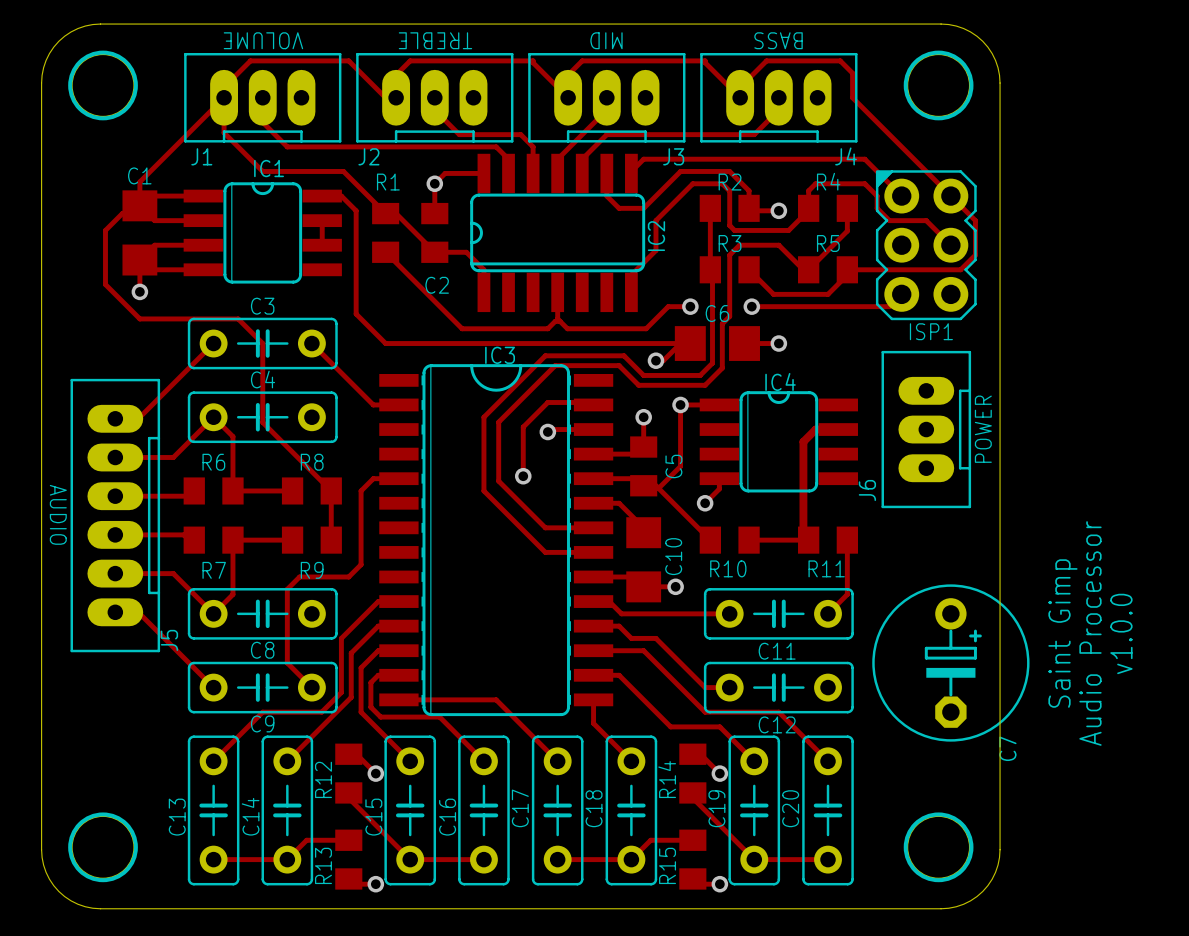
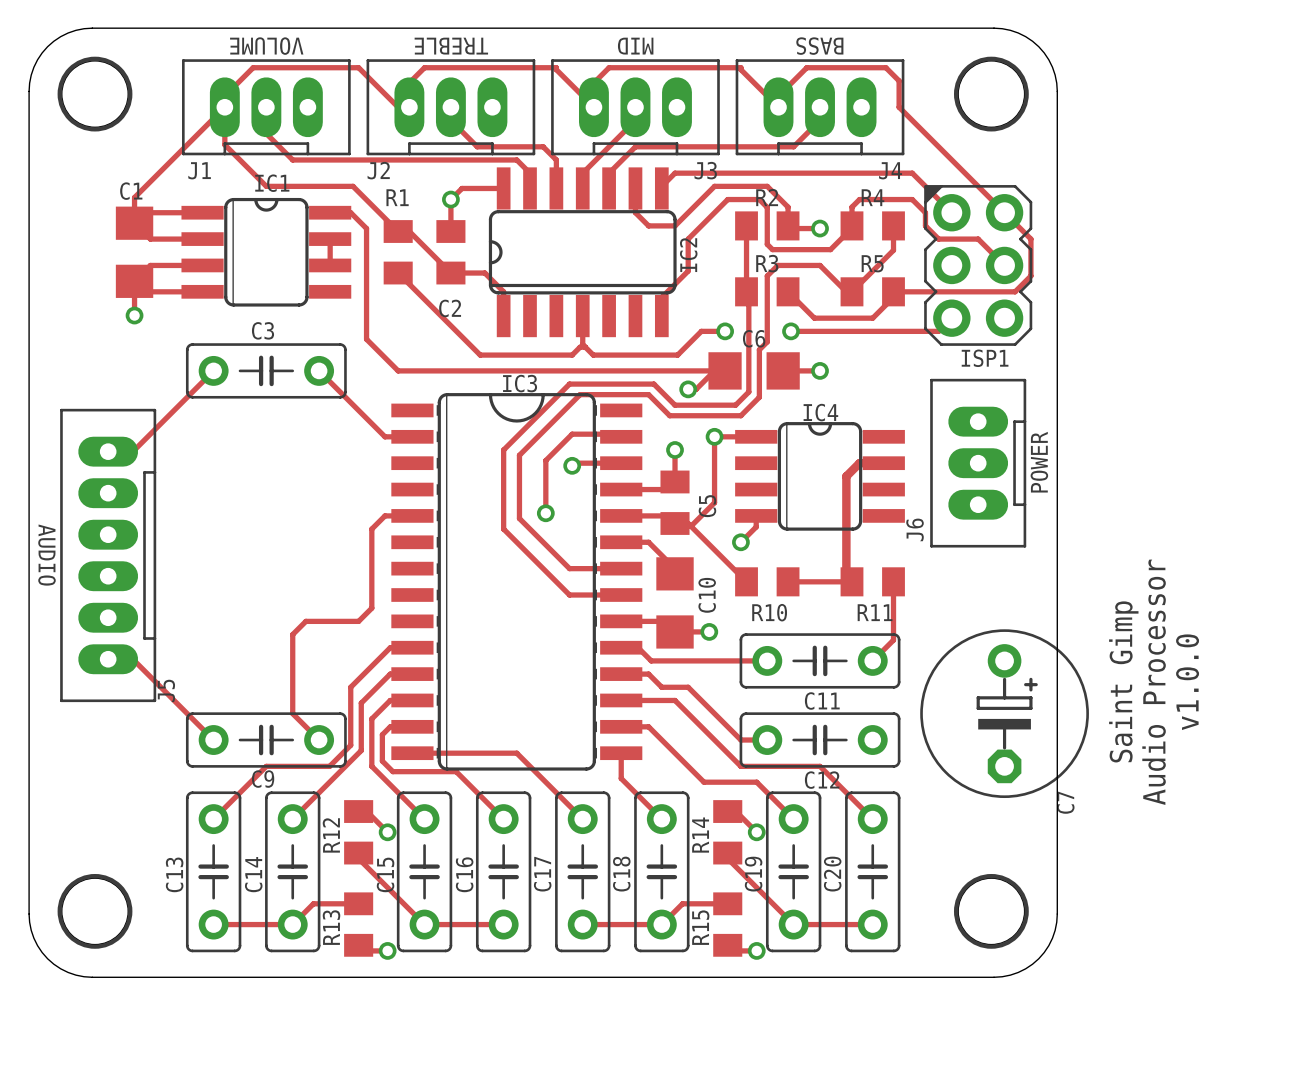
track: (139, 205) (122, 213) (105, 230) (105, 284) (139, 318) (238, 318) (262, 343) (262, 422) (331, 490) (331, 540) -> none
C4: (262, 417) -> none
track: (115, 457) (173, 457) (213, 417) (232, 436) (232, 490) (292, 490) -> none
track: (194, 490) (189, 496) (115, 496) -> none
R6: (213, 490) -> none
R8: (311, 490) -> none
track: (115, 534) (183, 534) (189, 540) (194, 540) -> none
R7: (213, 540) -> none
track: (292, 540) (232, 540) (232, 594) (213, 613) (173, 573) (115, 573) -> none
R9: (311, 540) -> none
C8: (262, 613) -> none

